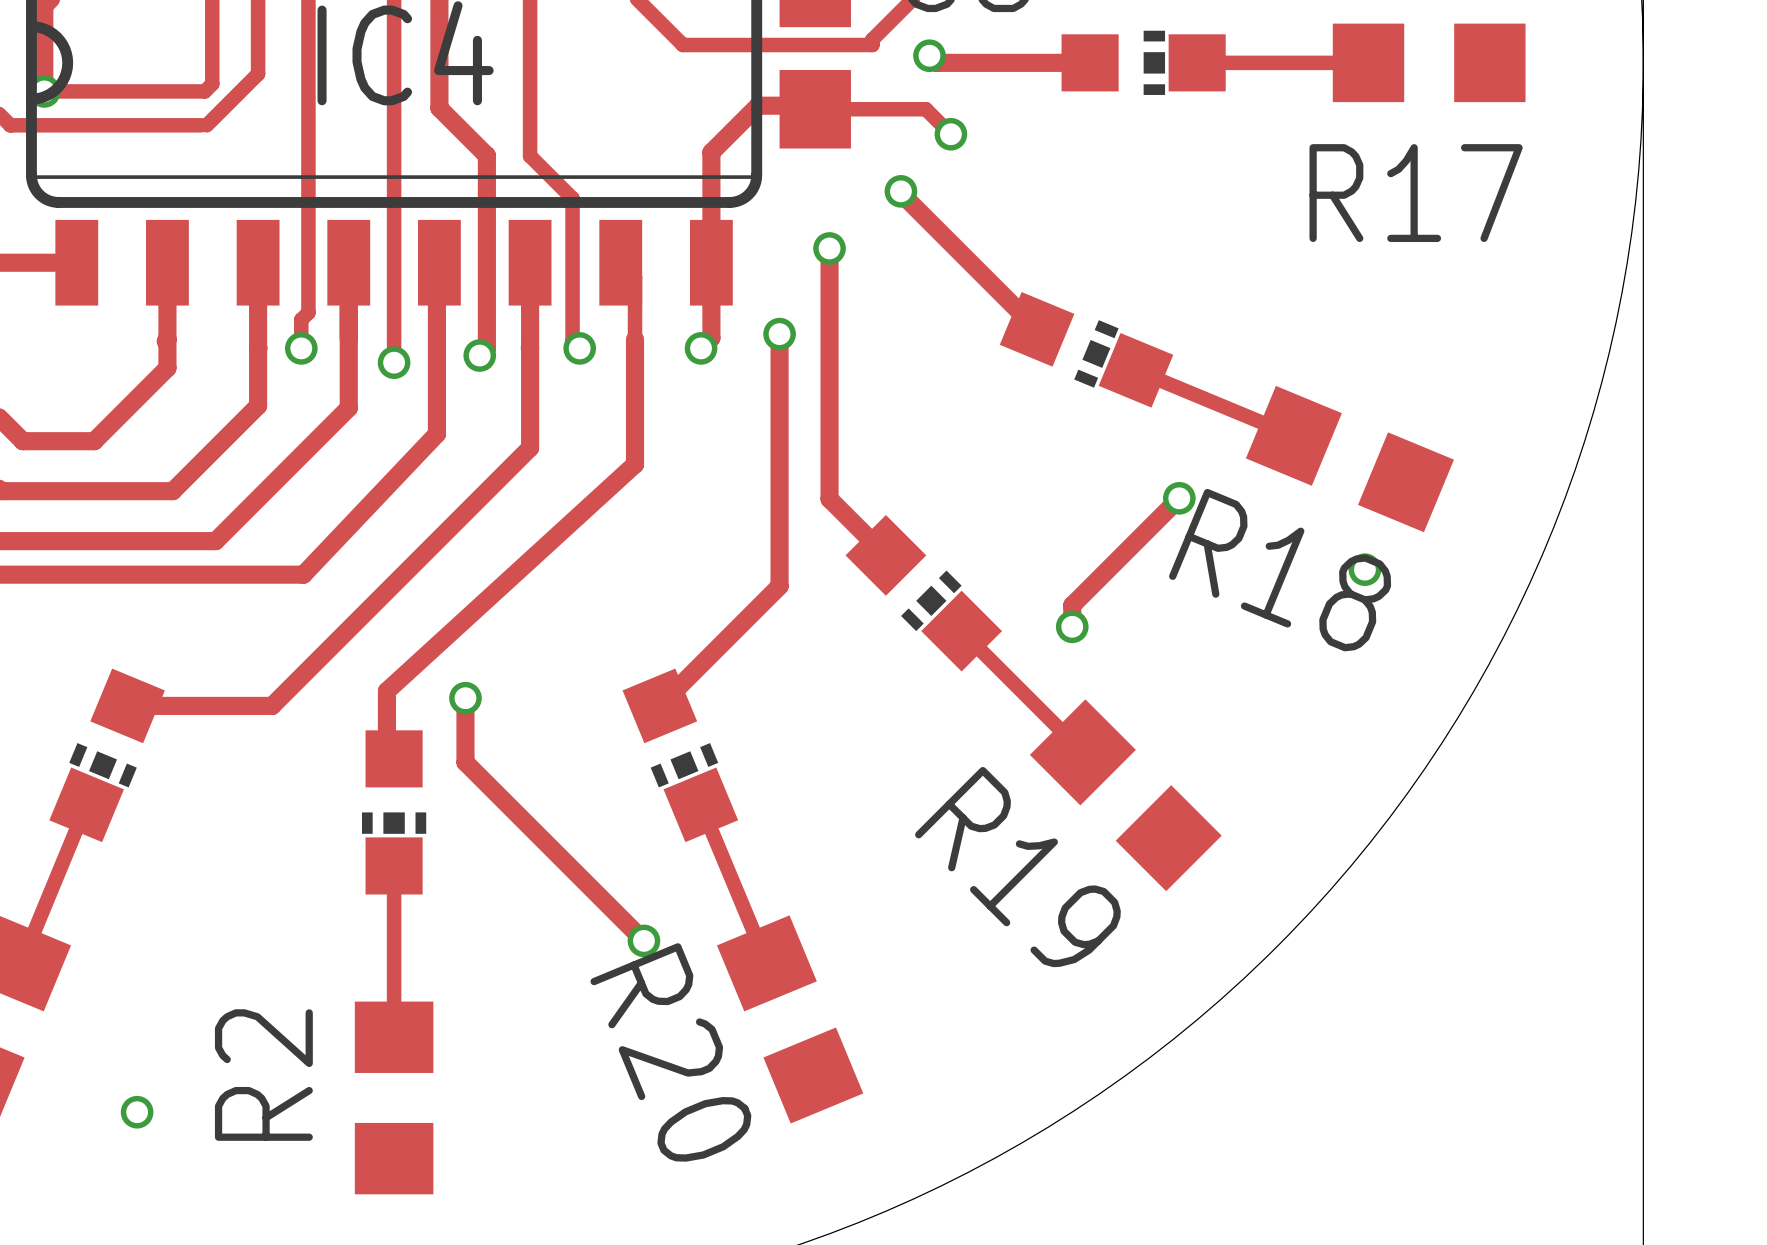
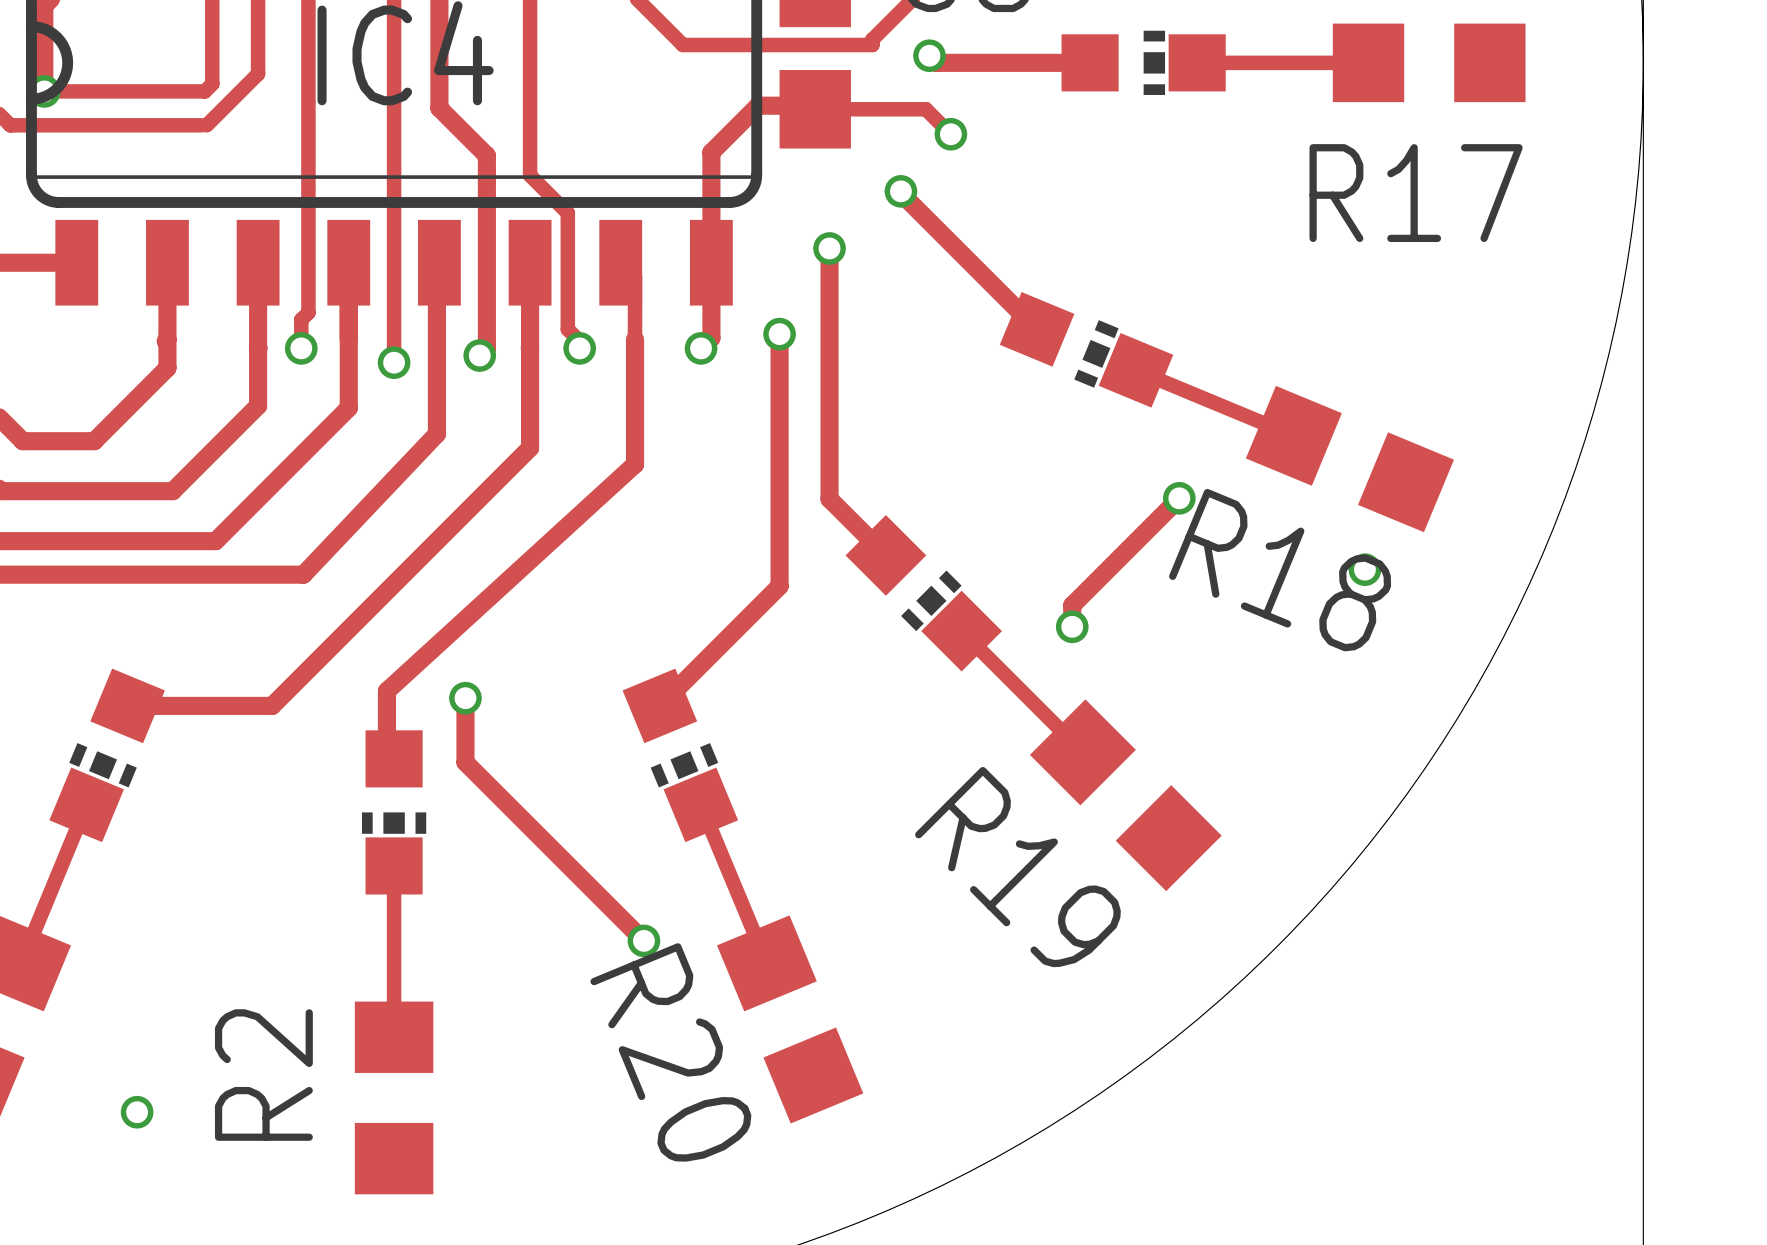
track: (530, 156) (572, 198) (572, 341) (579, 348) -> (530, 156) (530, 175) (567, 213) (567, 329) (579, 341)

